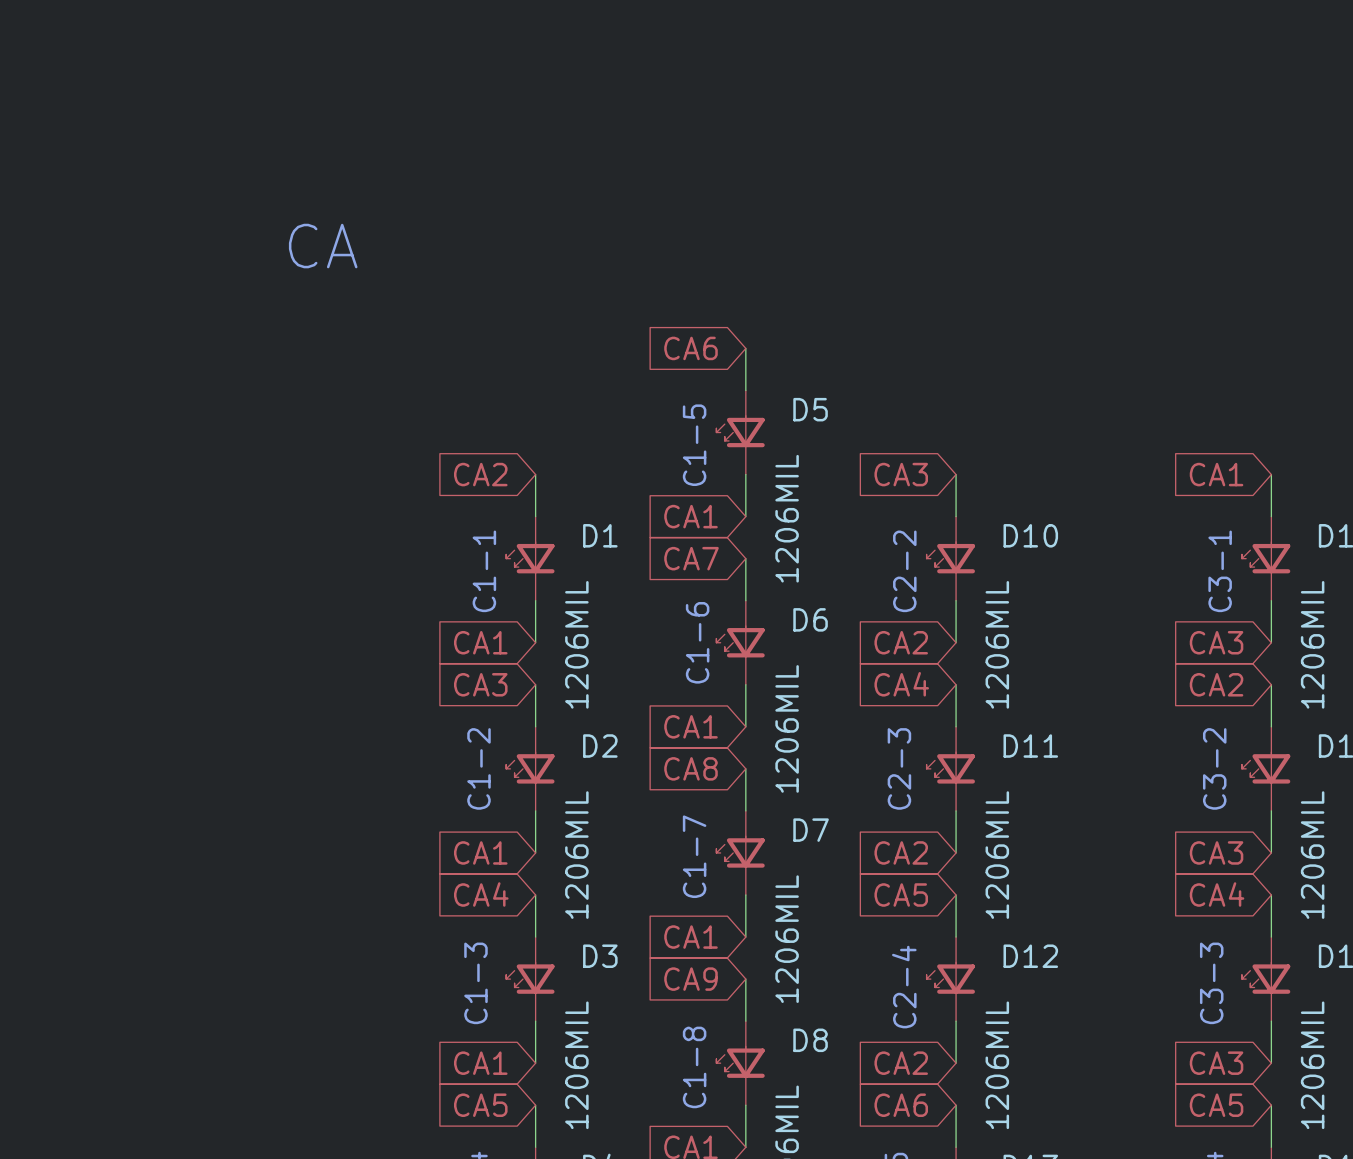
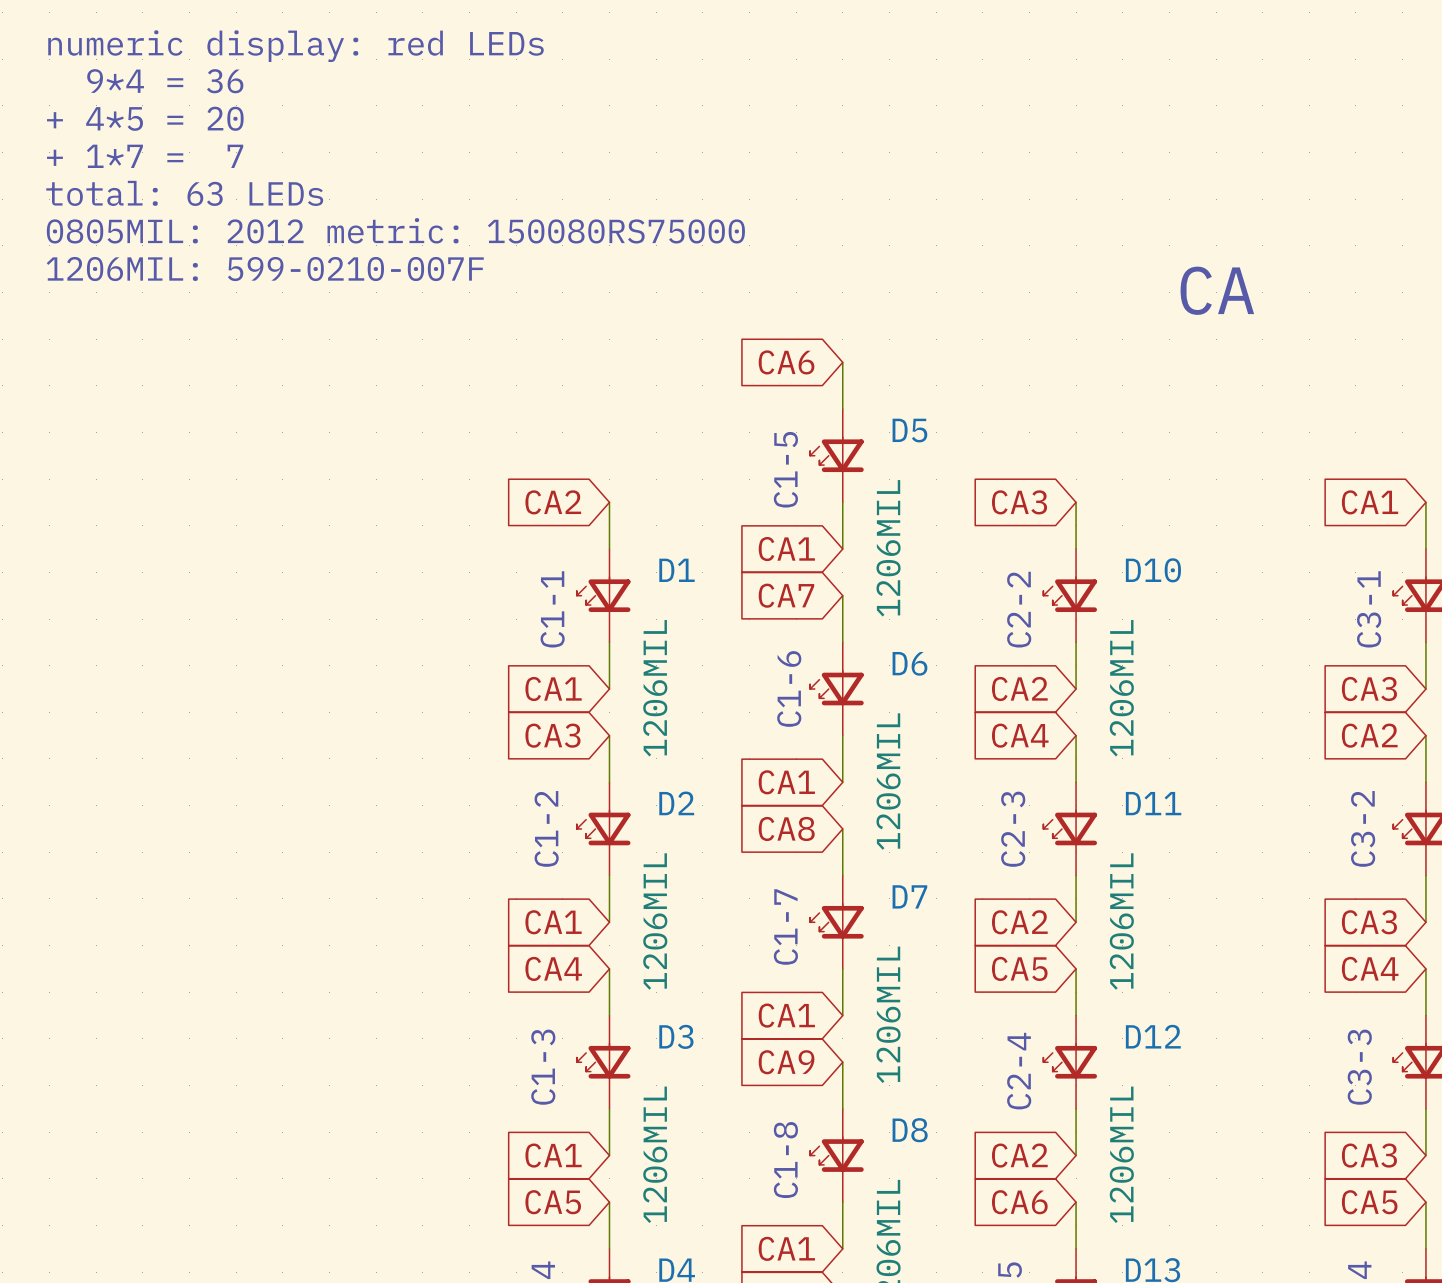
text: none -> numeric display: red LEDs (295, 46)
text: none -> 9*4 = 36 (165, 81)
text: none -> + 4*5 = 20 (145, 118)
text: none -> + 1*7 = 7 (145, 156)
text: none -> total: 63 LEDs (184, 193)
text: none -> 0805MIL: 2012 metric: 150080RS75000 (395, 230)
text: CA (323, 246) -> none
text: none -> 1206MIL: 599-0210-007F (265, 269)
text: none -> CA (1217, 290)

